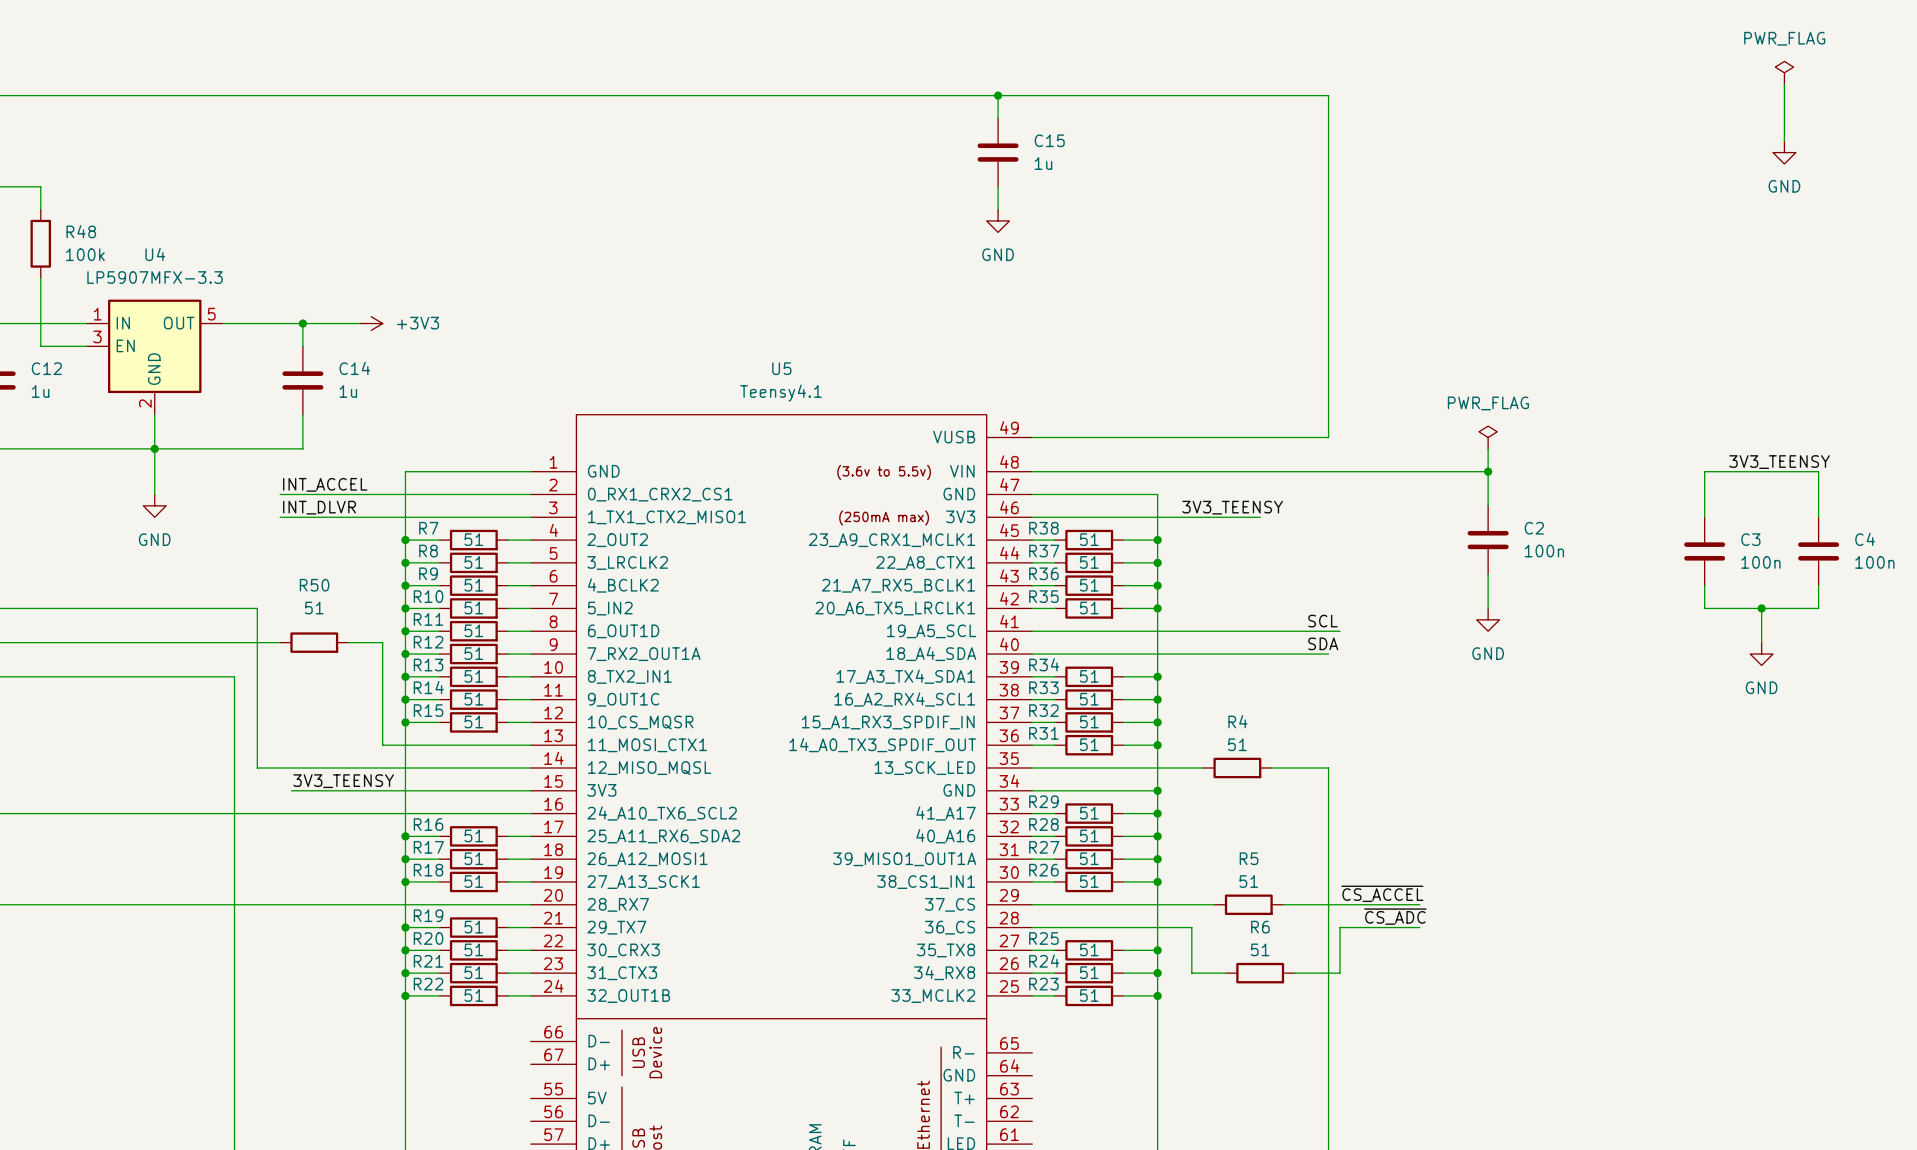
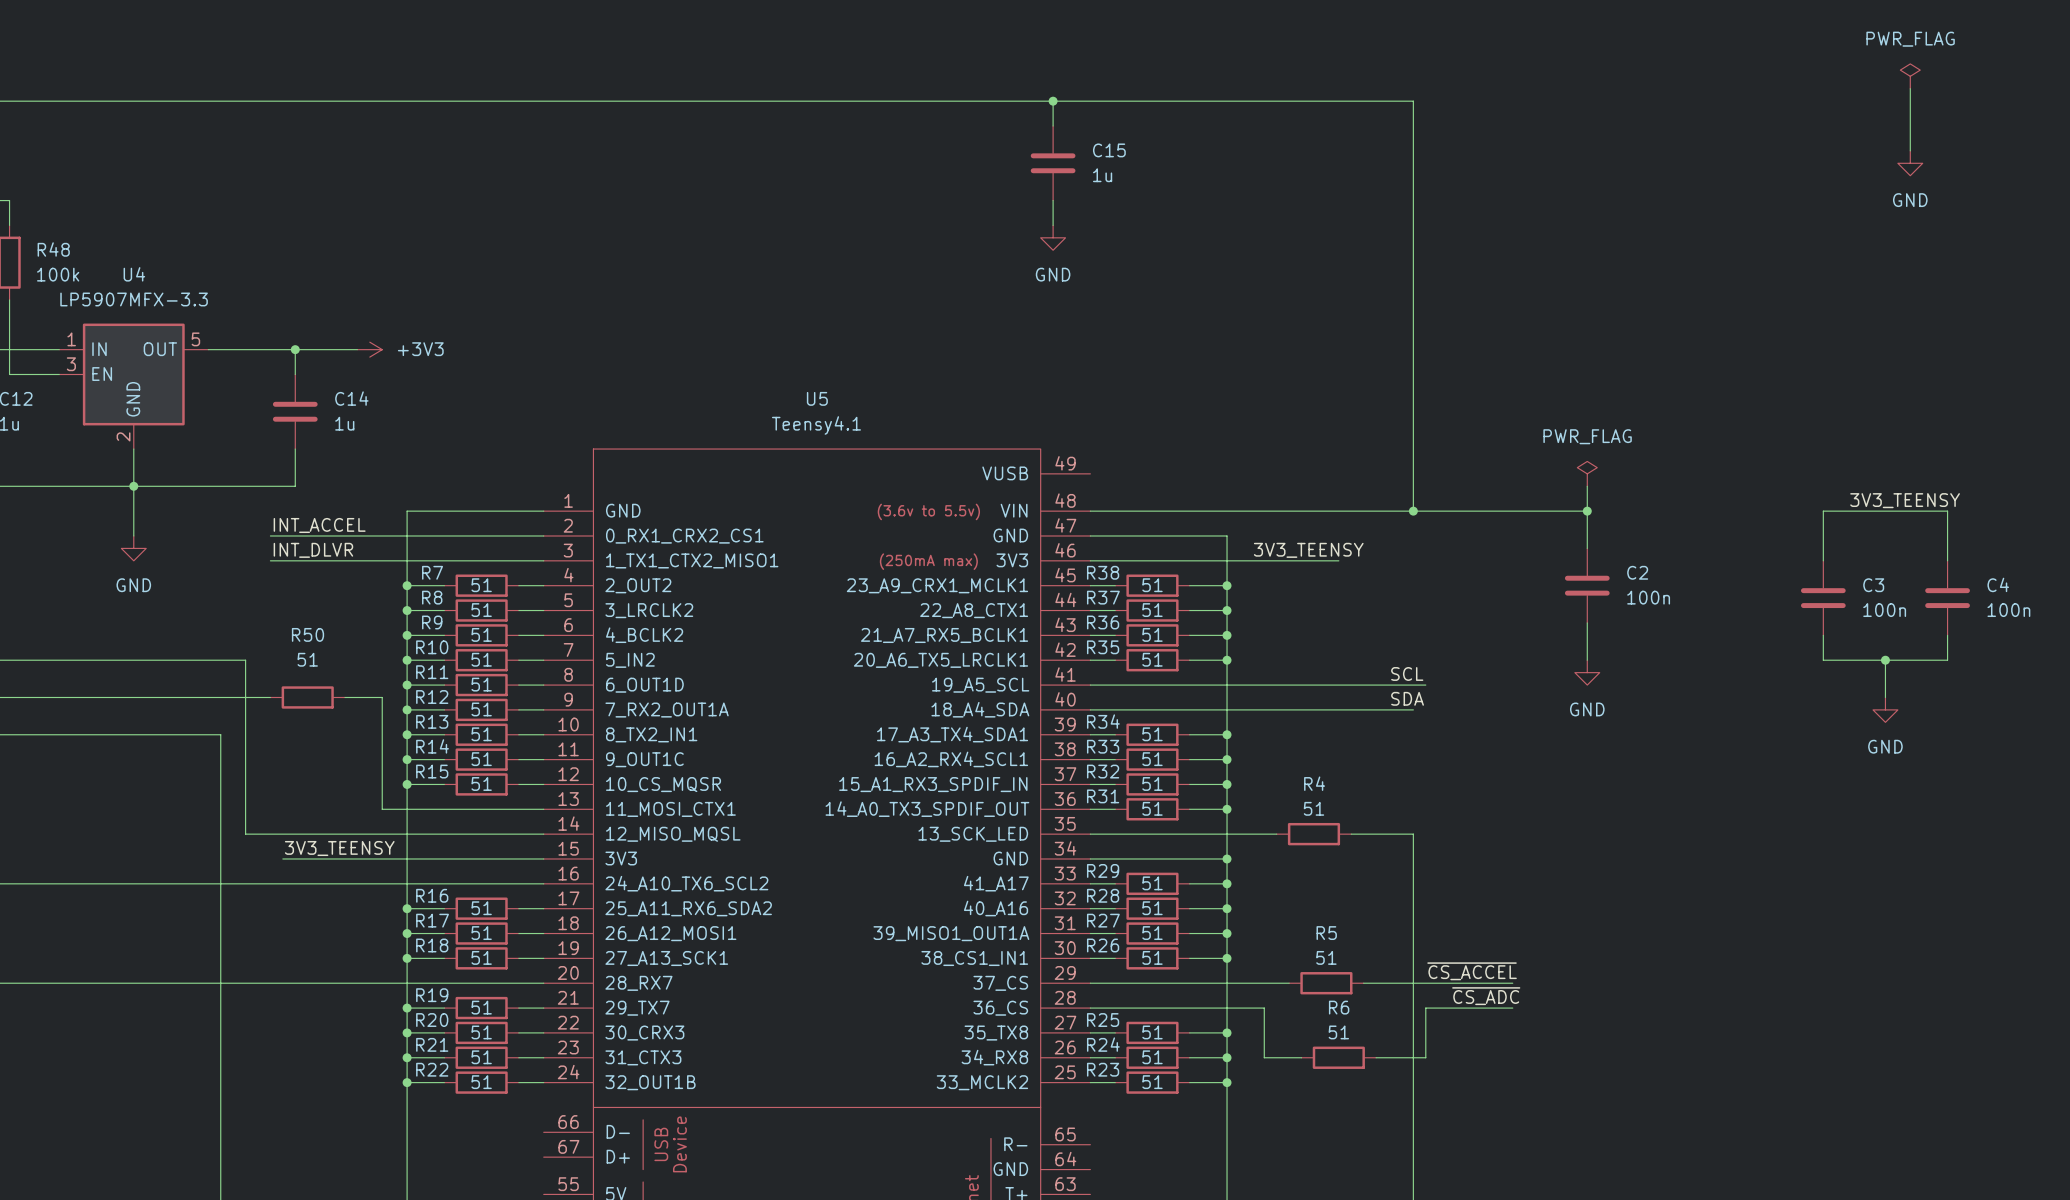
wire: (1032, 437) (1328, 437) -> (1413, 511) (1413, 473)
junction: none -> (1413, 511)

